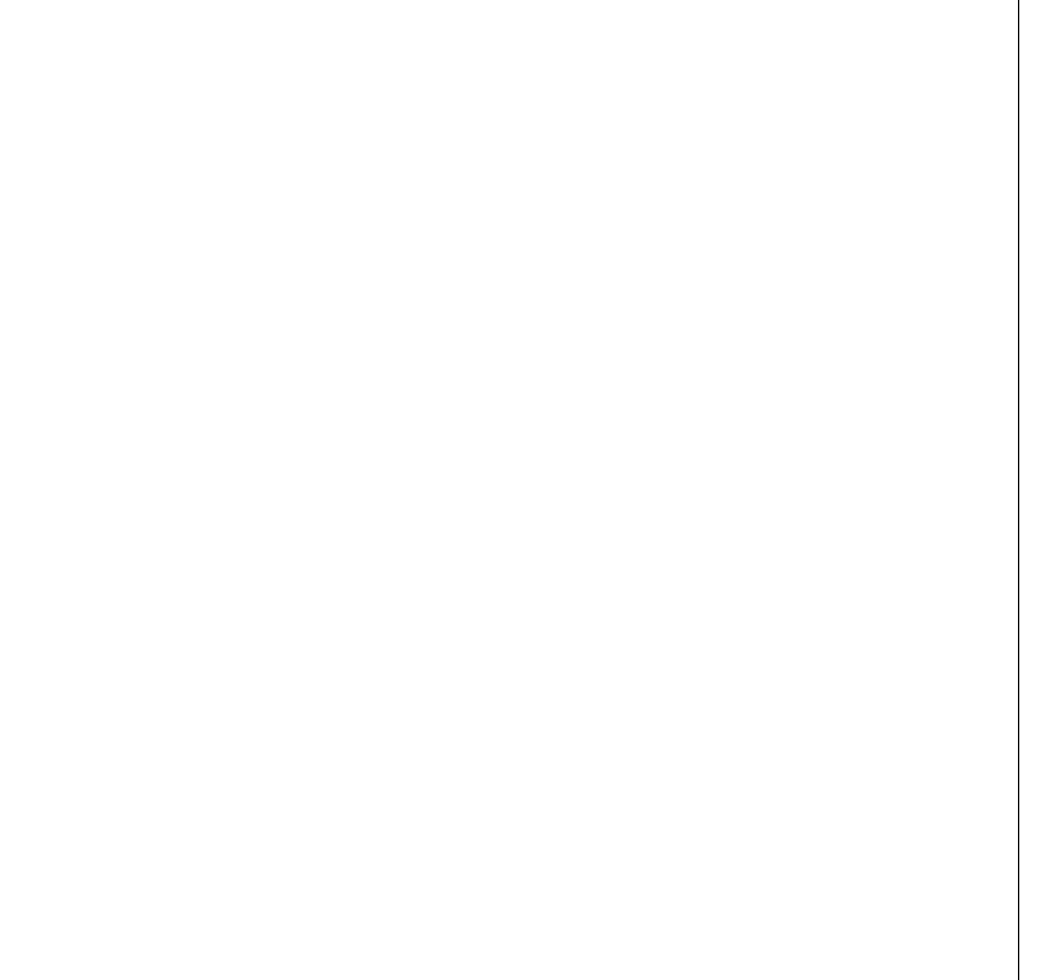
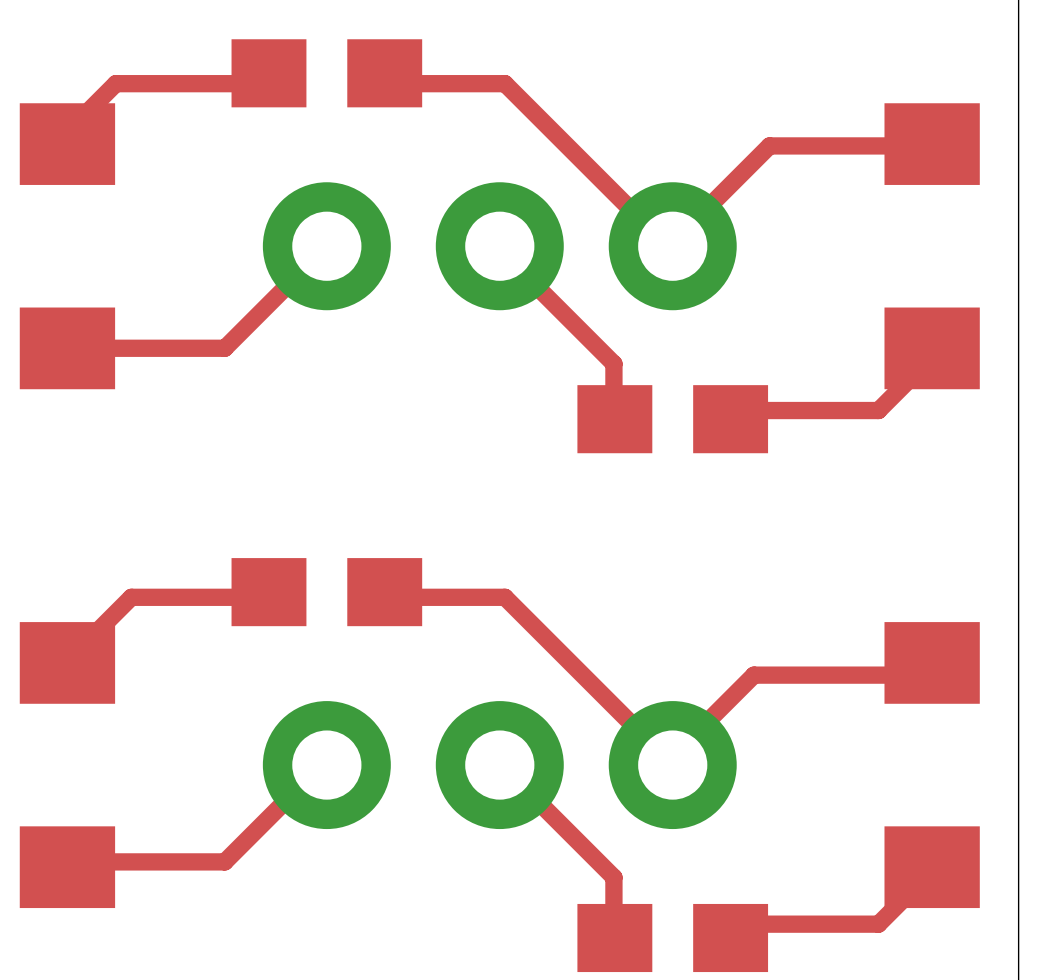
top track: none -> (268, 73) (255, 83) (115, 83) (69, 130) (67, 144)
part: none -> (326, 73)
top track: none -> (384, 73) (396, 83) (504, 83) (660, 239) (672, 246) (676, 239) (769, 145) (925, 145) (932, 144)
part: none -> (67, 246)
top track: none -> (326, 246) (224, 348) (67, 348)
top track: none -> (499, 246) (504, 254) (613, 363) (614, 419)
part: none -> (499, 246)
part: none -> (932, 246)
top track: none -> (932, 348) (925, 363) (878, 410) (738, 410) (730, 419)
part: none -> (672, 419)
top track: none -> (268, 592) (255, 597) (131, 597) (67, 662)
part: none -> (326, 592)
top track: none -> (384, 592) (396, 597) (504, 597) (672, 765) (676, 752) (754, 675) (925, 675) (932, 662)
part: none -> (67, 765)
top track: none -> (326, 765) (318, 768) (224, 861) (69, 861) (67, 867)
top track: none -> (499, 765) (613, 877) (614, 938)
part: none -> (499, 765)
part: none -> (932, 765)
top track: none -> (932, 867) (925, 877) (878, 924) (738, 924) (730, 938)
part: none -> (672, 938)

